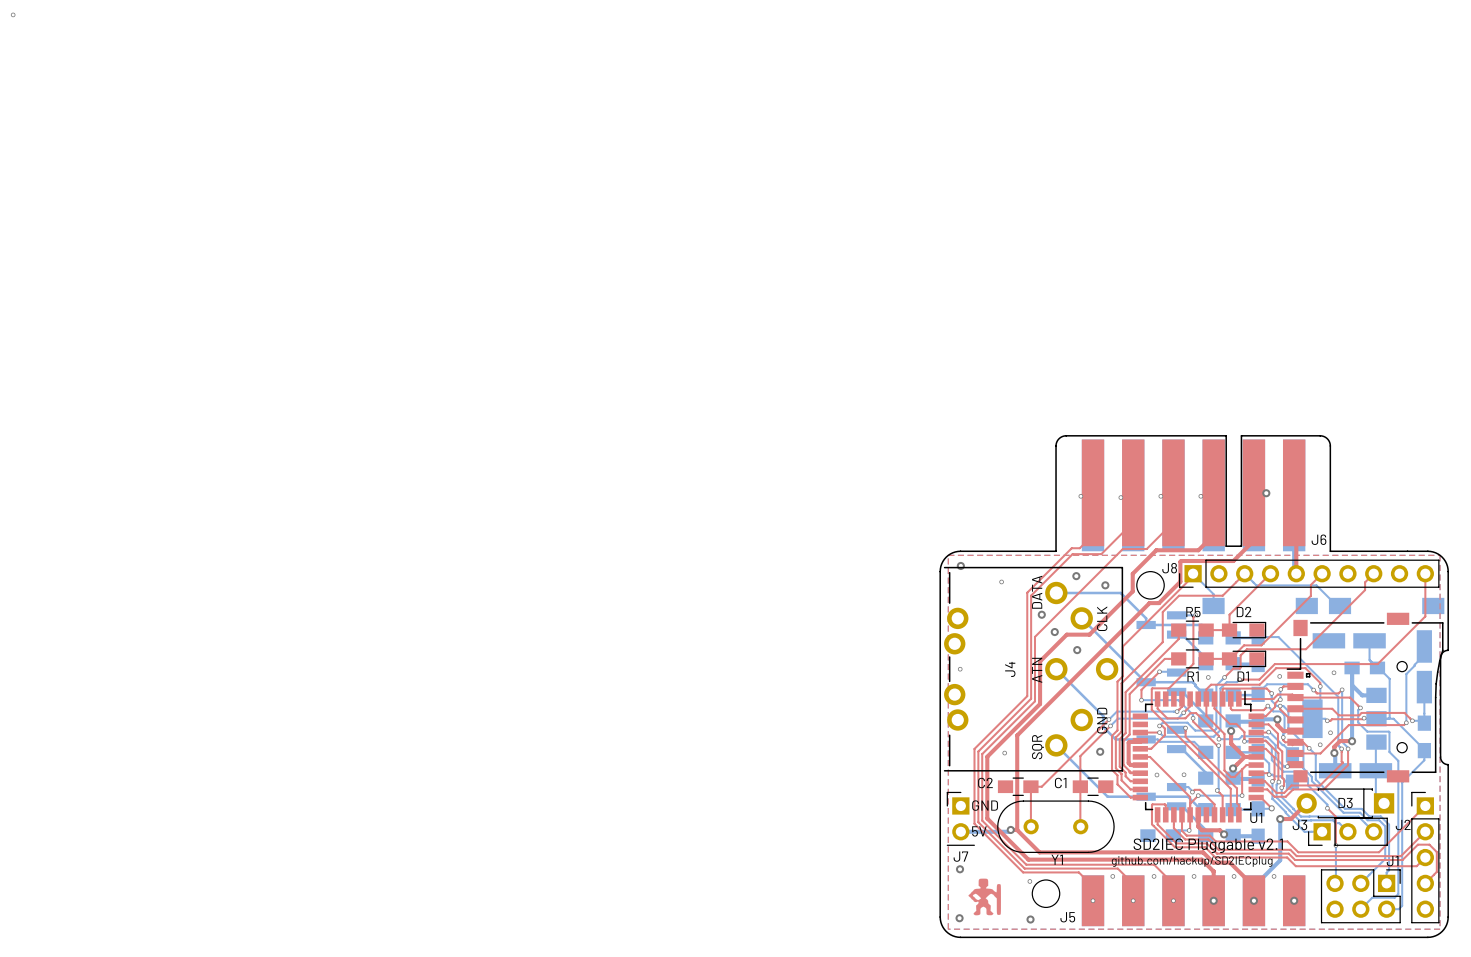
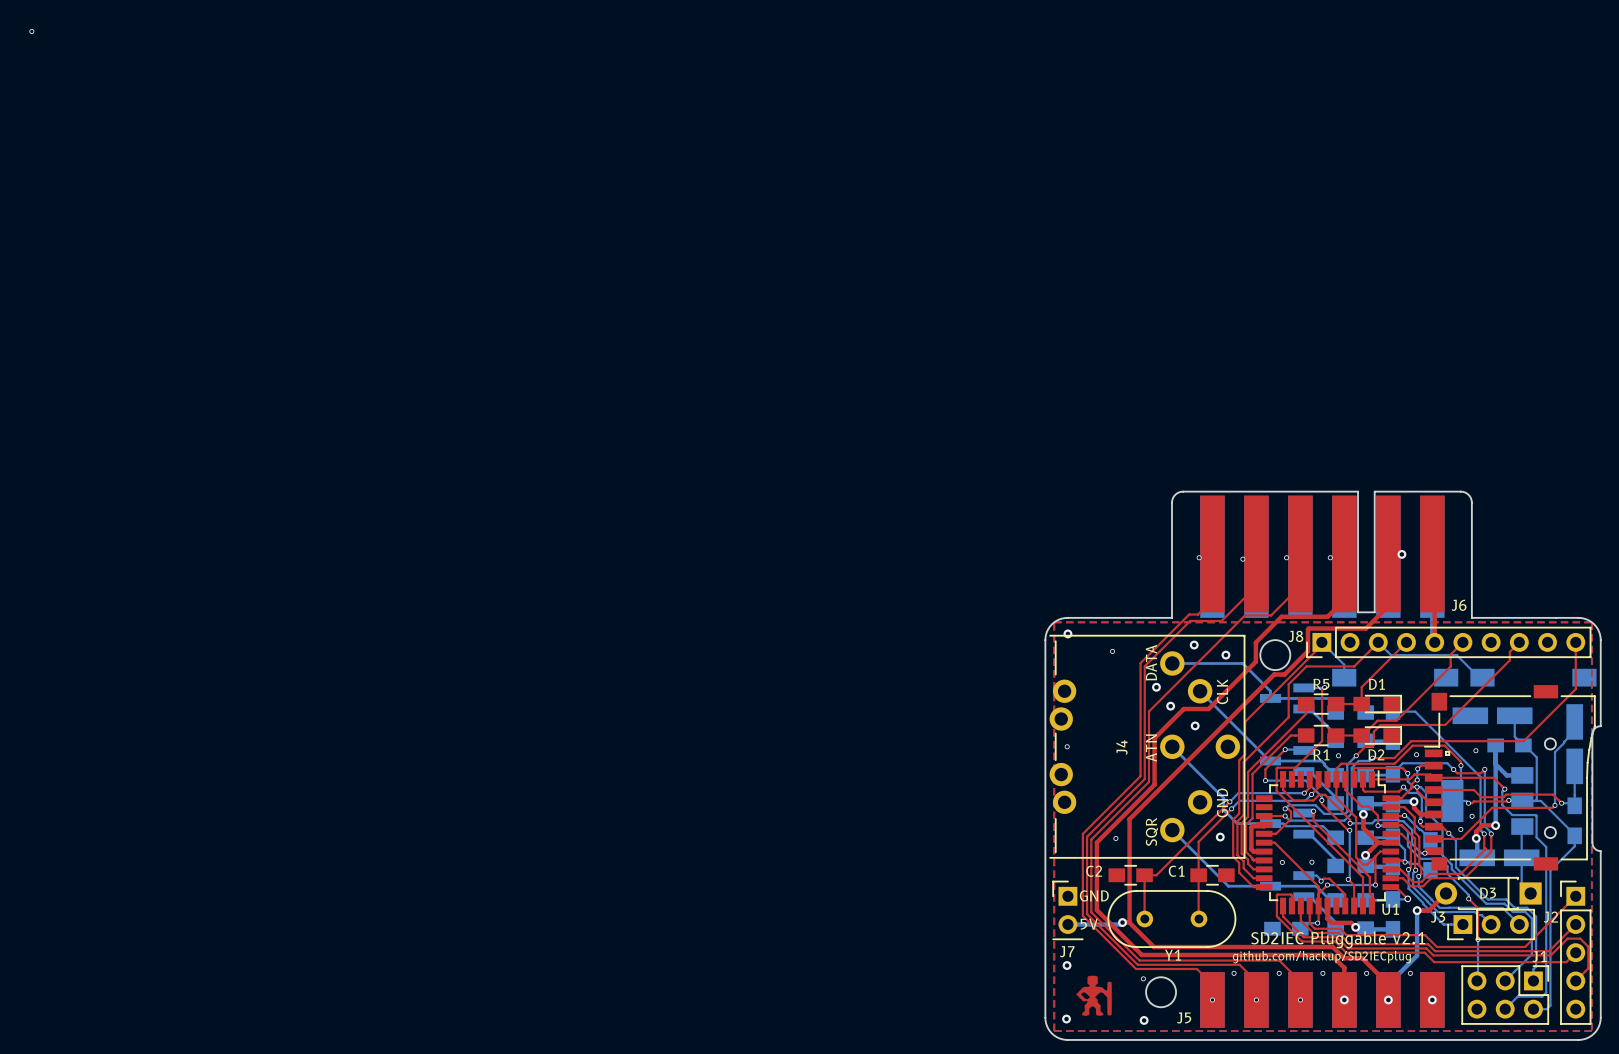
D2 name: D2 (1244, 611) -> D1 (1376, 684)
D1 name: D1 (1243, 676) -> D2 (1376, 754)

